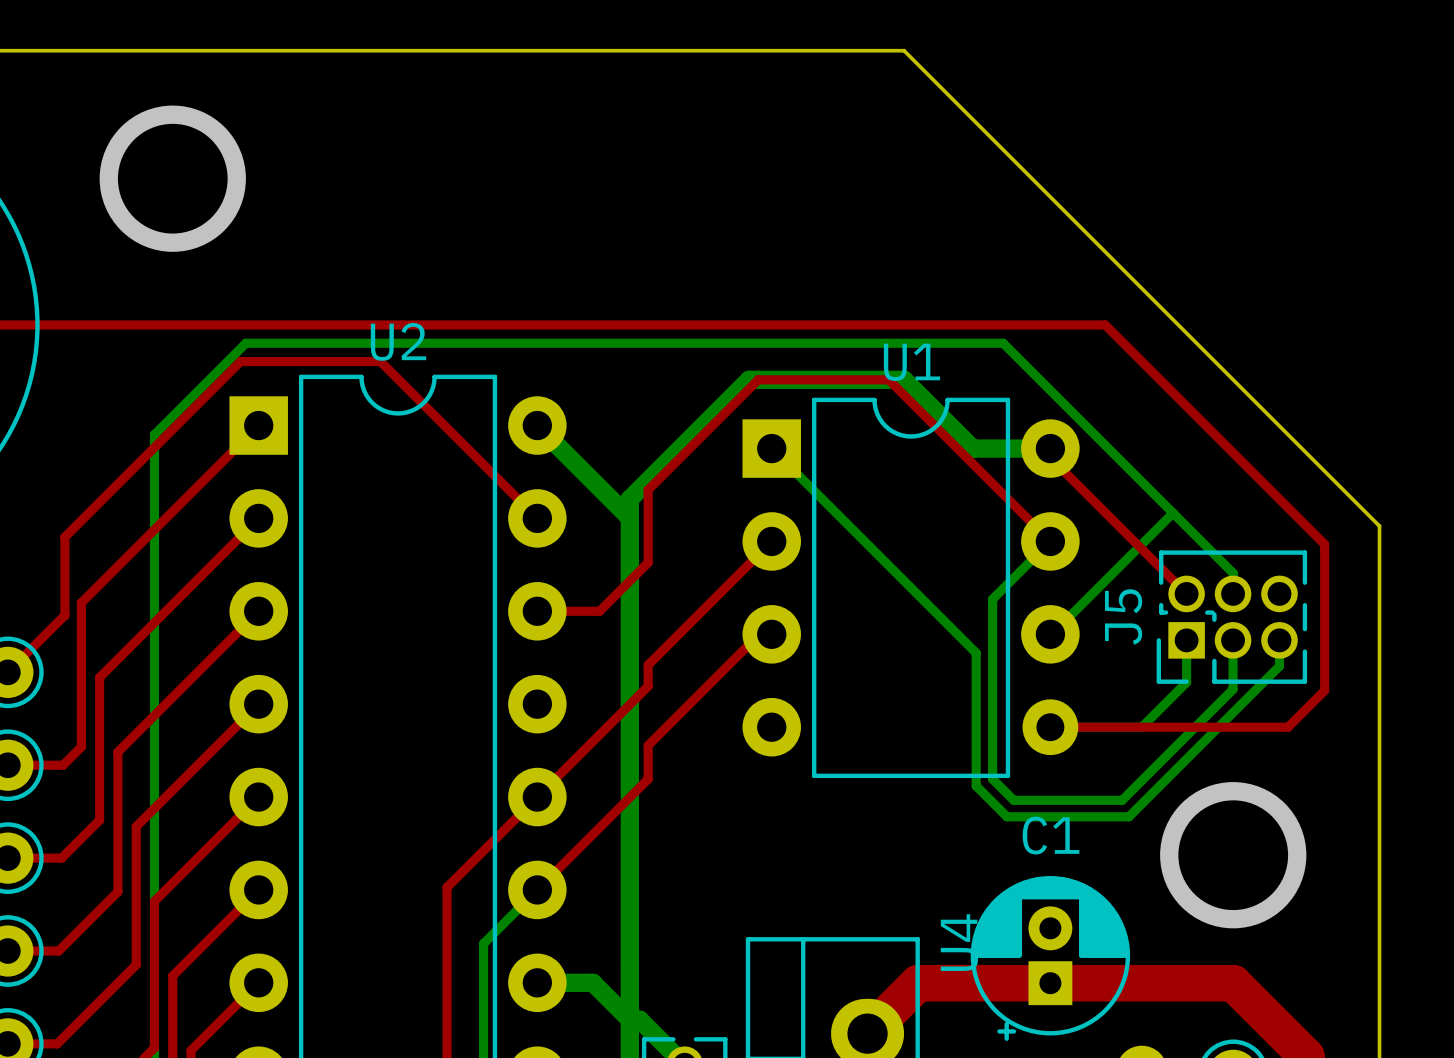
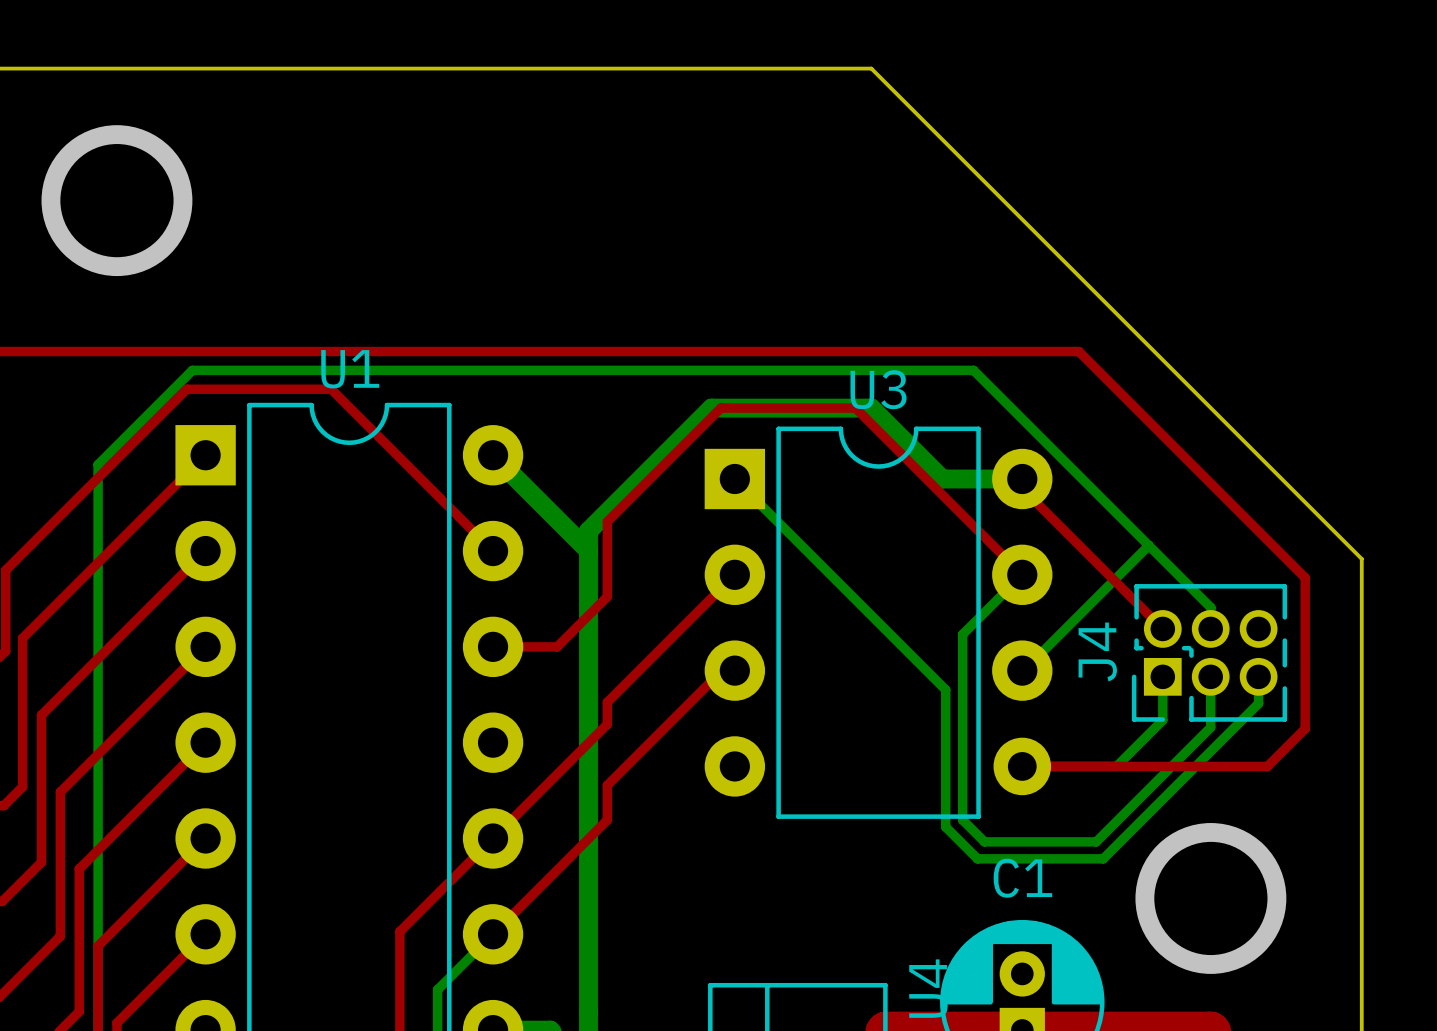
U2 name: U2 (398, 341) -> U1 (350, 369)
U1 name: U1 (911, 362) -> U3 (878, 389)
J5 name: J5 (1123, 616) -> J4 (1097, 651)

